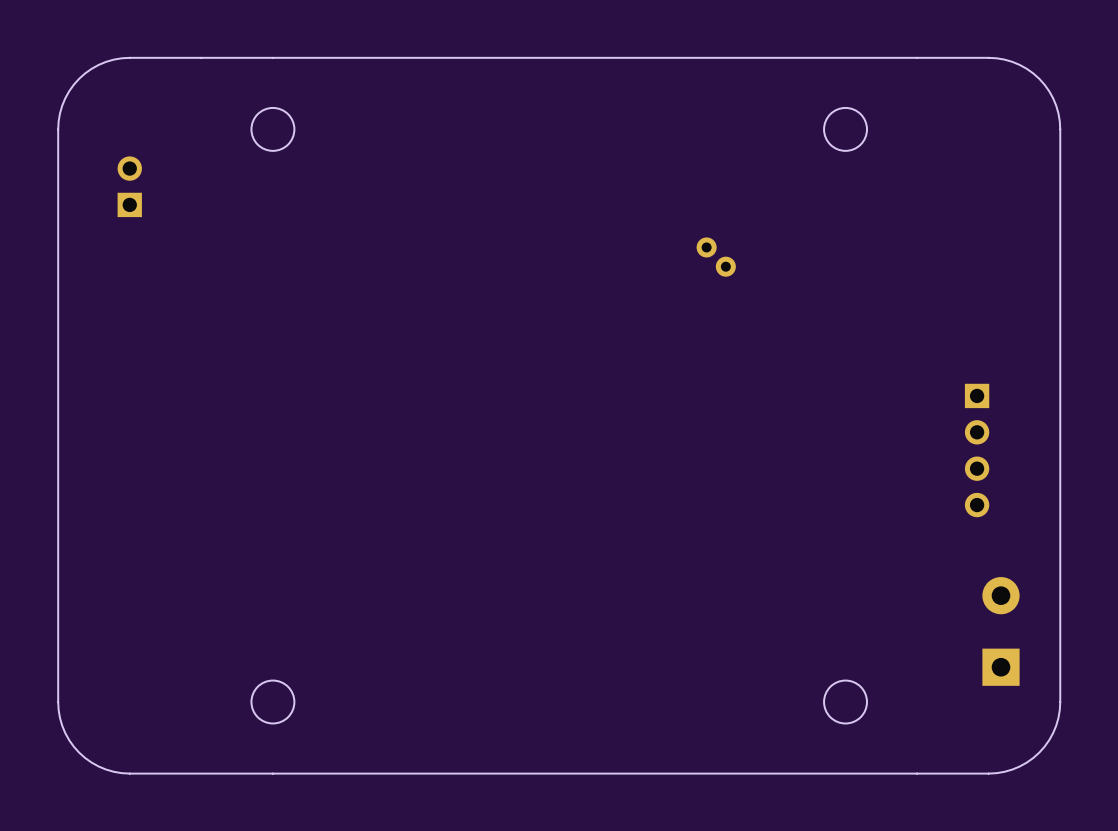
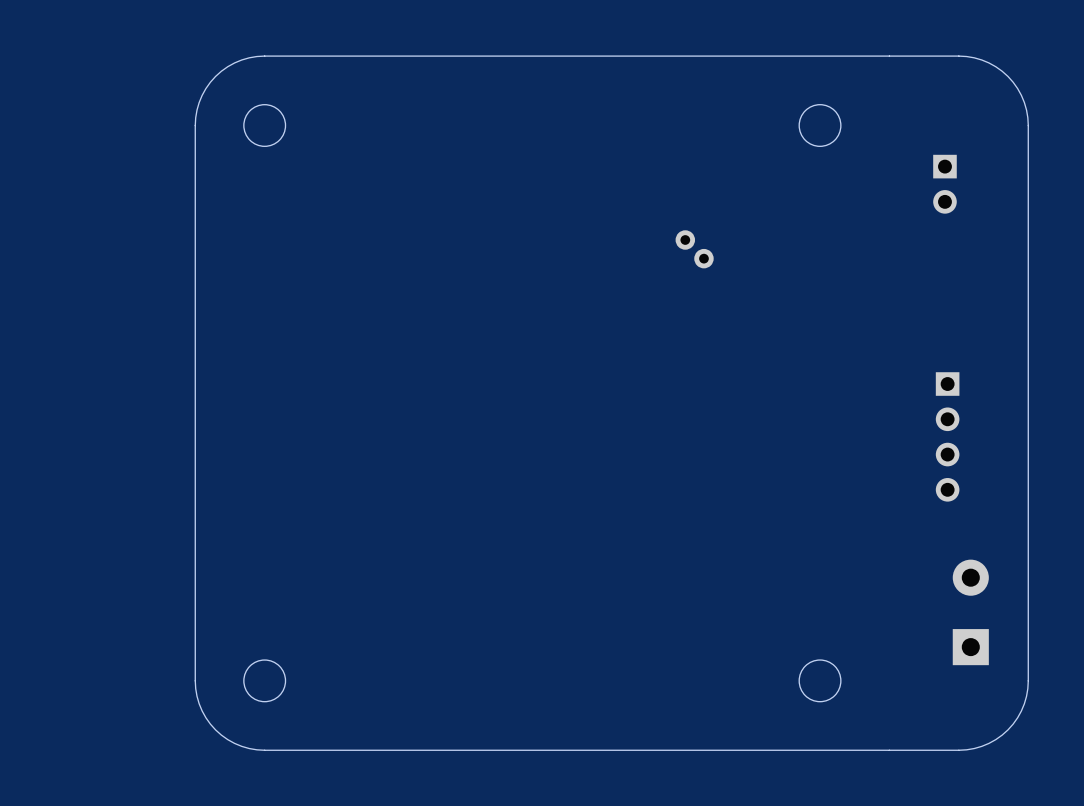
board edge: (272, 57) (129, 57) (106, 61) (85, 73) (73, 84) (62, 105) (58, 129) (58, 702) (62, 725) (73, 746) (85, 757) (98, 766) (113, 771) (129, 773) (272, 773) -> (264, 56) (249, 57) (234, 62) (215, 76) (205, 88) (199, 102) (195, 125) (195, 688) (202, 710) (210, 724) (221, 735) (241, 746) (264, 750)
part: (129, 186) -> none
part: none -> (944, 184)

